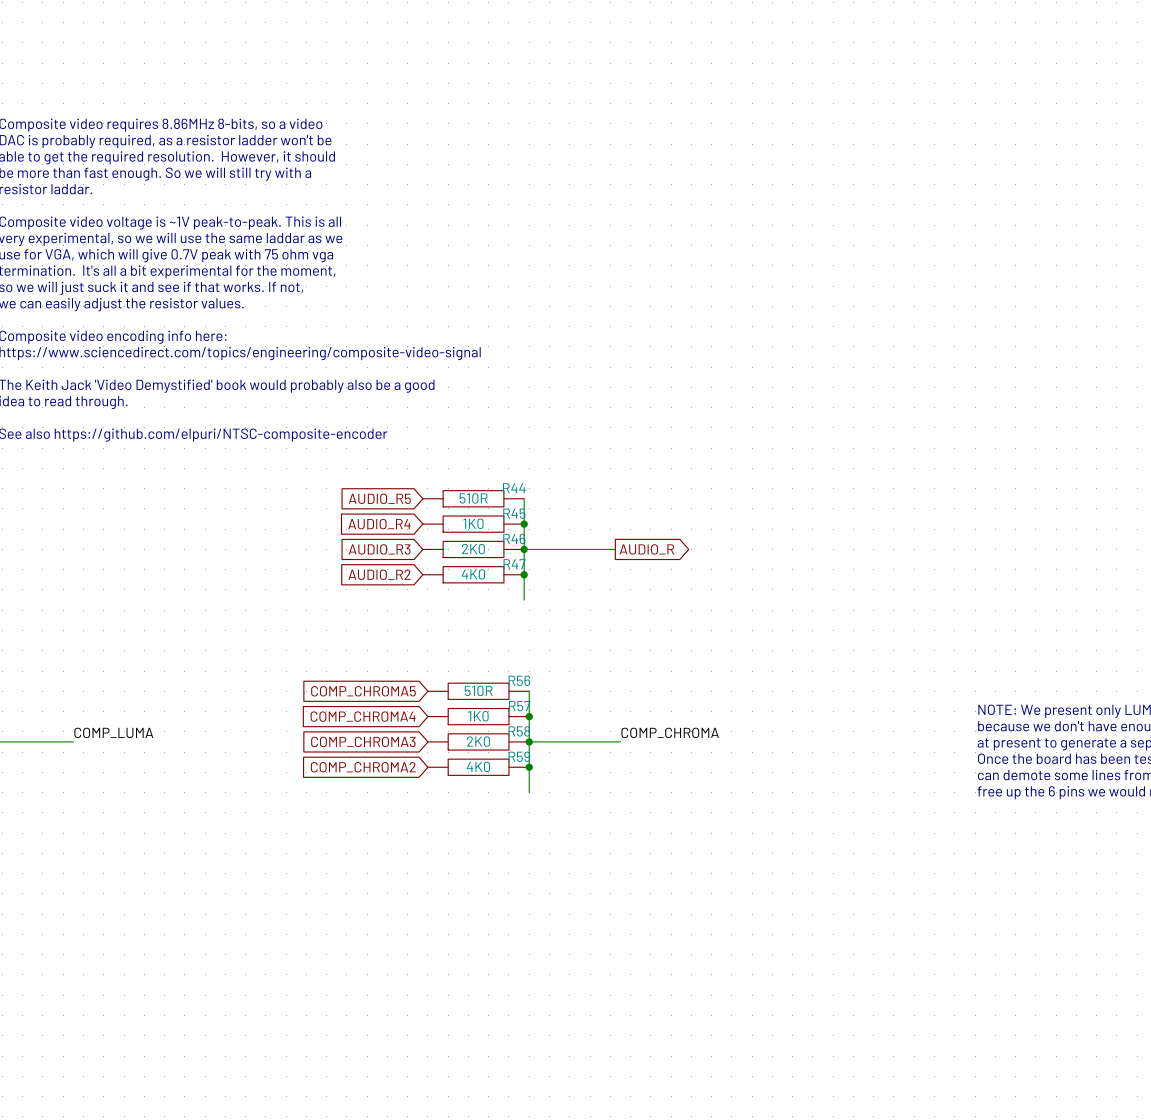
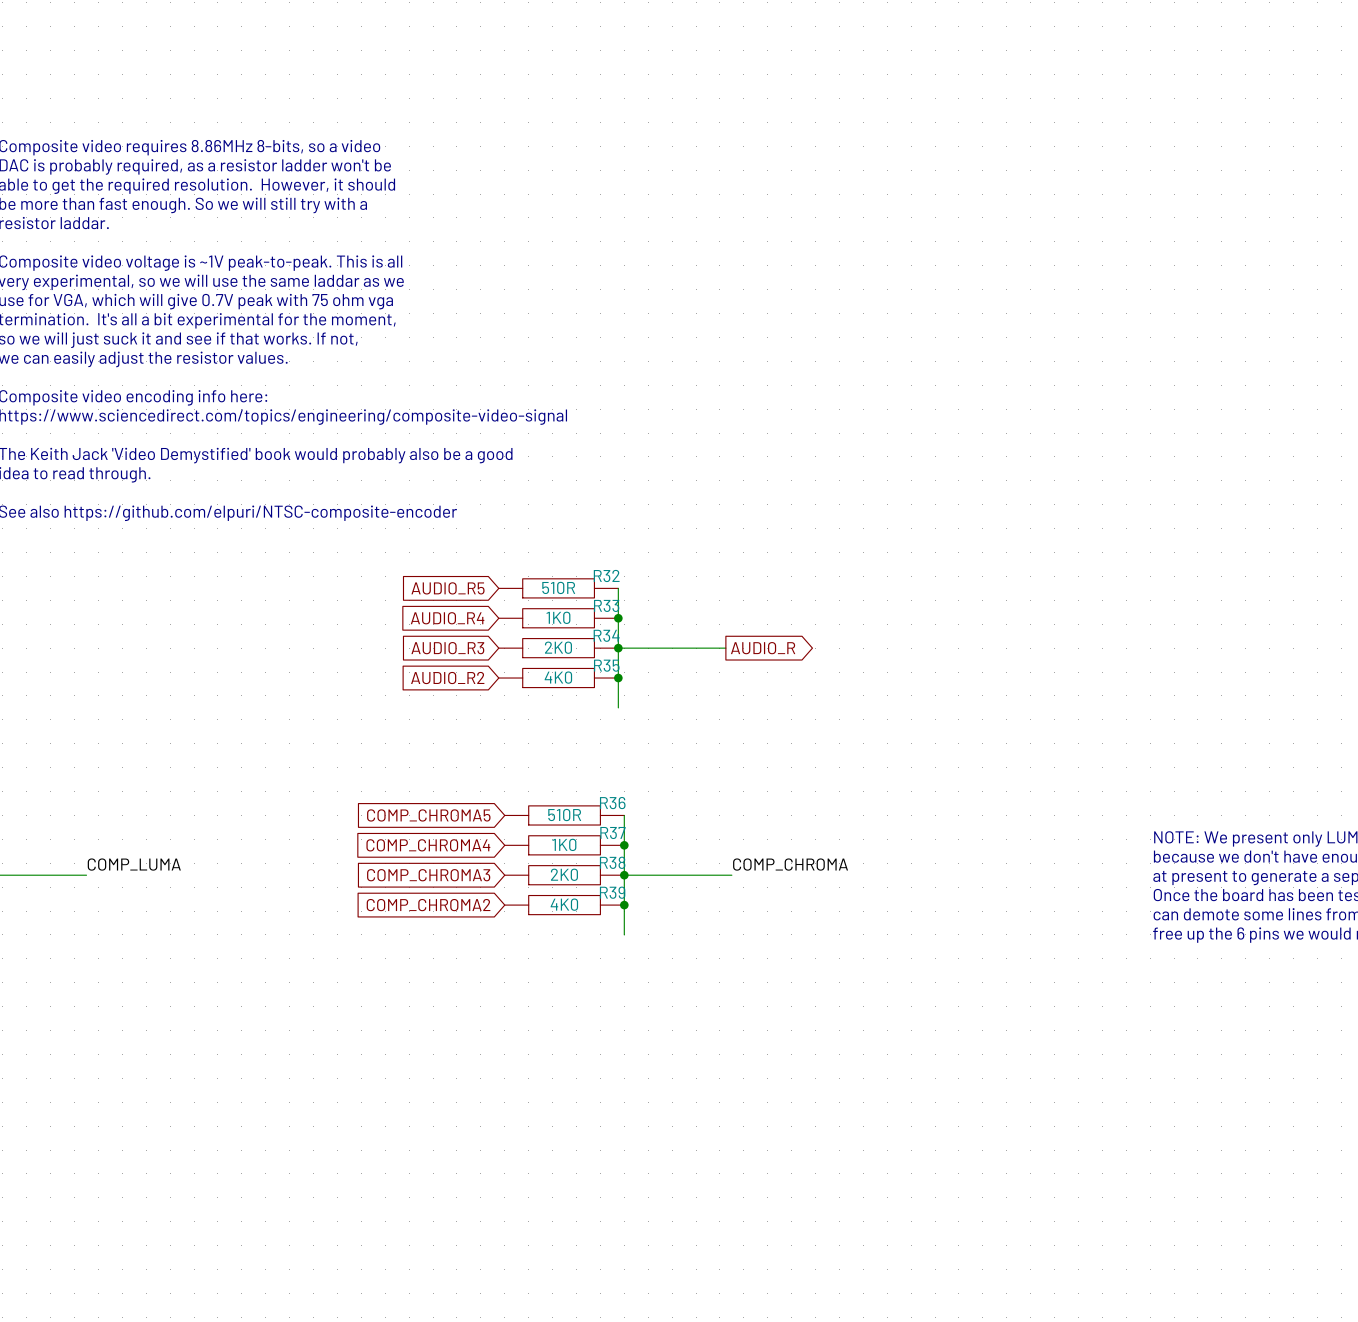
R44 name: R44 (514, 488) -> R32 (606, 575)
R45 name: R45 (514, 513) -> R33 (606, 605)
R46 name: R46 (514, 538) -> R34 (606, 635)
R47 name: R47 (514, 564) -> R35 (606, 665)
R56 name: R56 (519, 680) -> R36 (612, 803)
R57 name: R57 (519, 706) -> R37 (612, 833)
R58 name: R58 (519, 731) -> R38 (612, 862)
R59 name: R59 (519, 756) -> R39 (612, 892)

